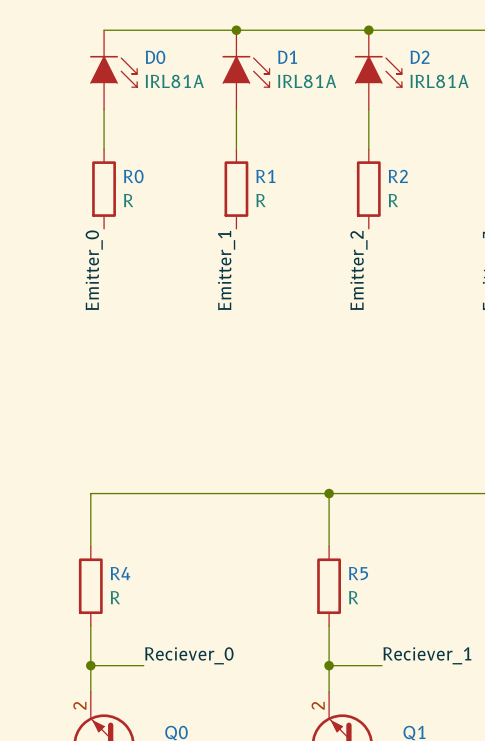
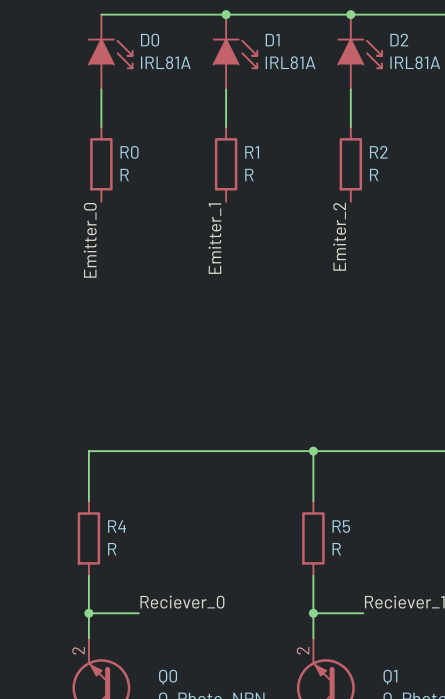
label: Emitter_2 (358, 270) -> Emiter_2 (339, 236)

